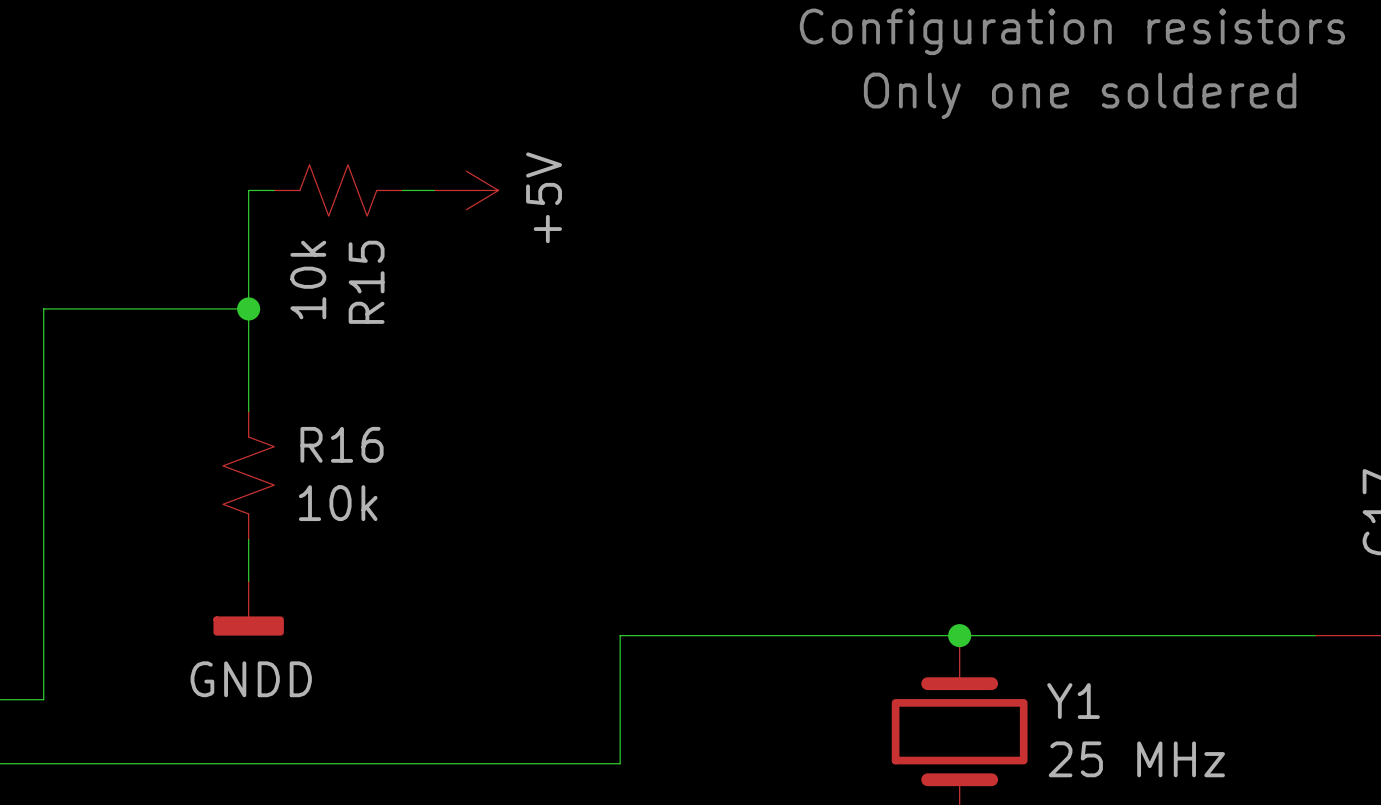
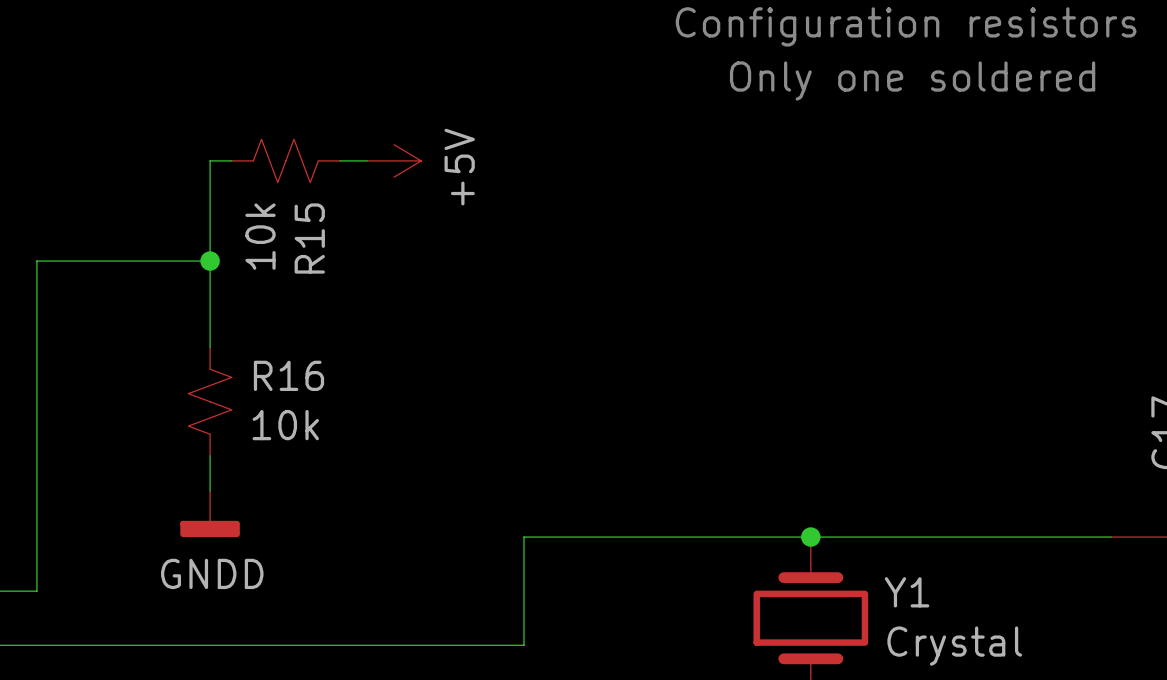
Y1 value: 25 MHz (1136, 759) -> Crystal (954, 646)

